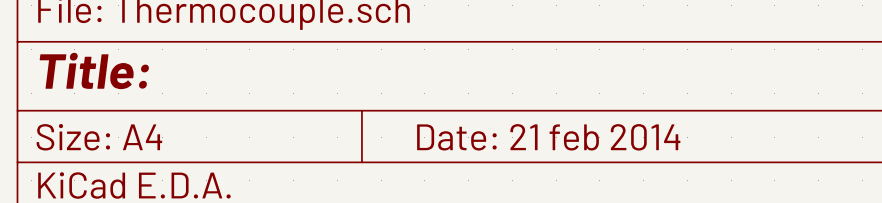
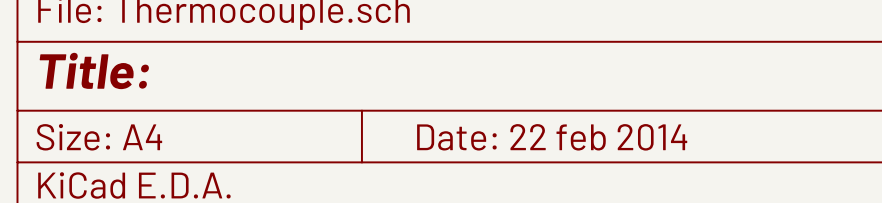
title block: Date: 21 feb 2014 (548, 137) -> Date: 22 feb 2014 (552, 137)

